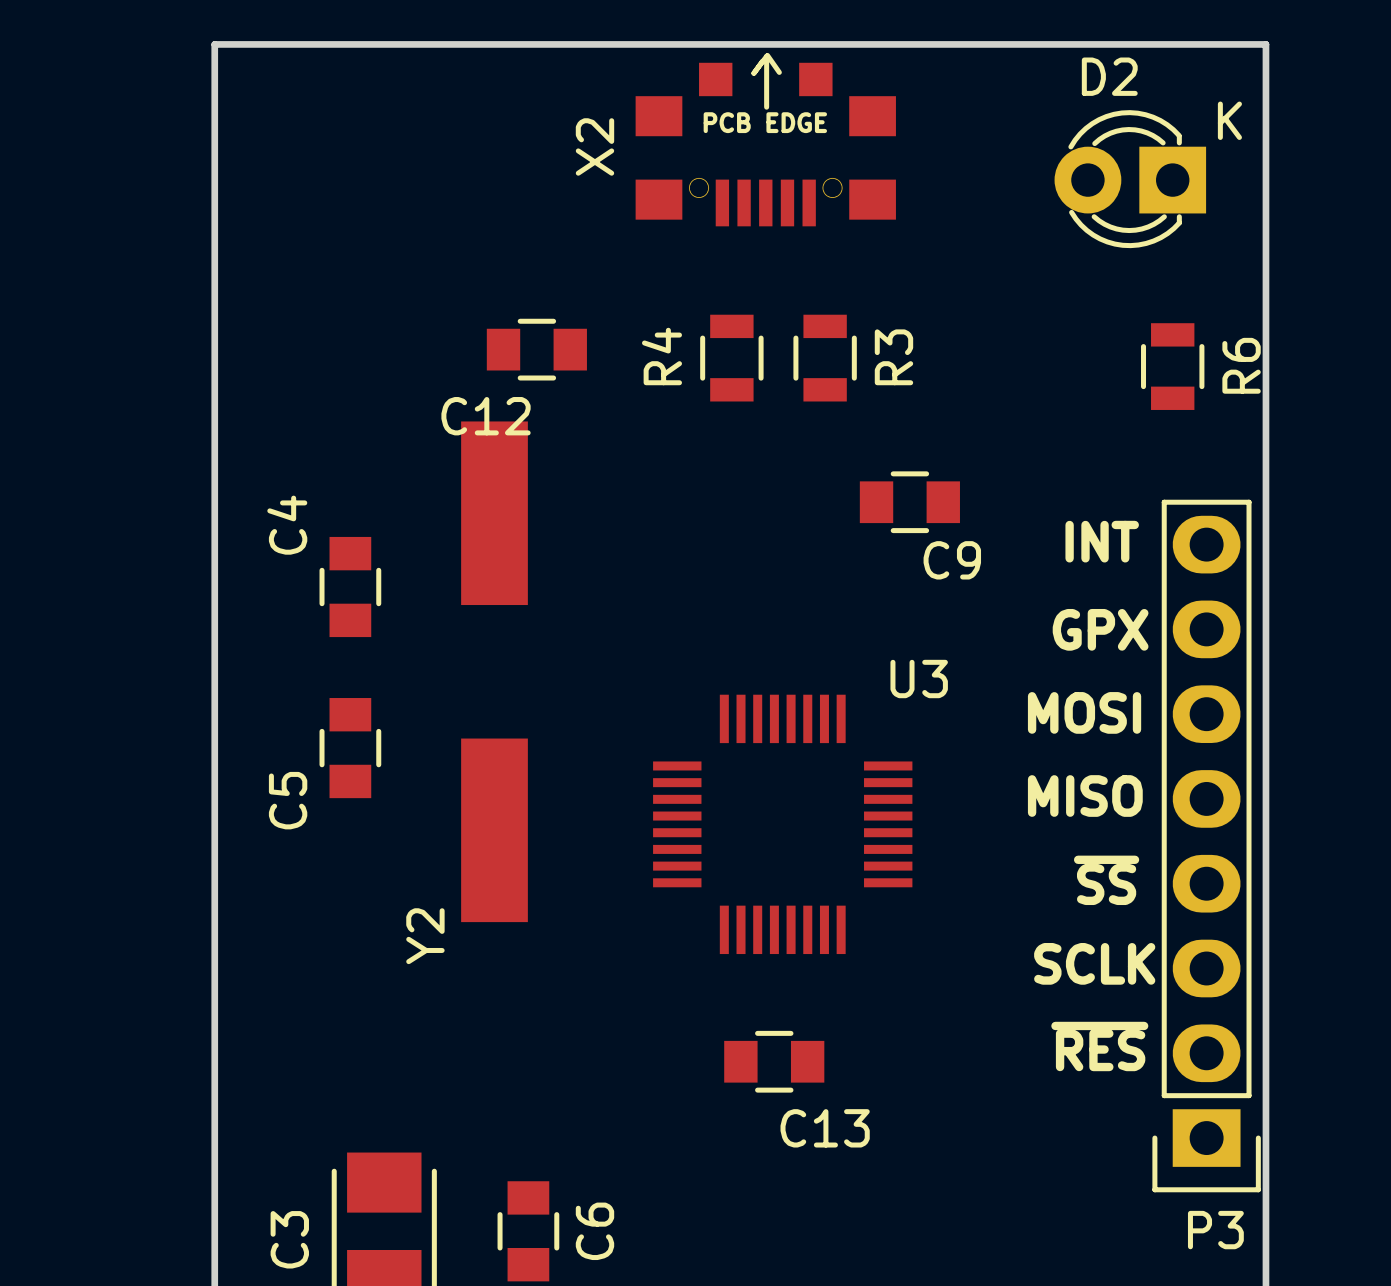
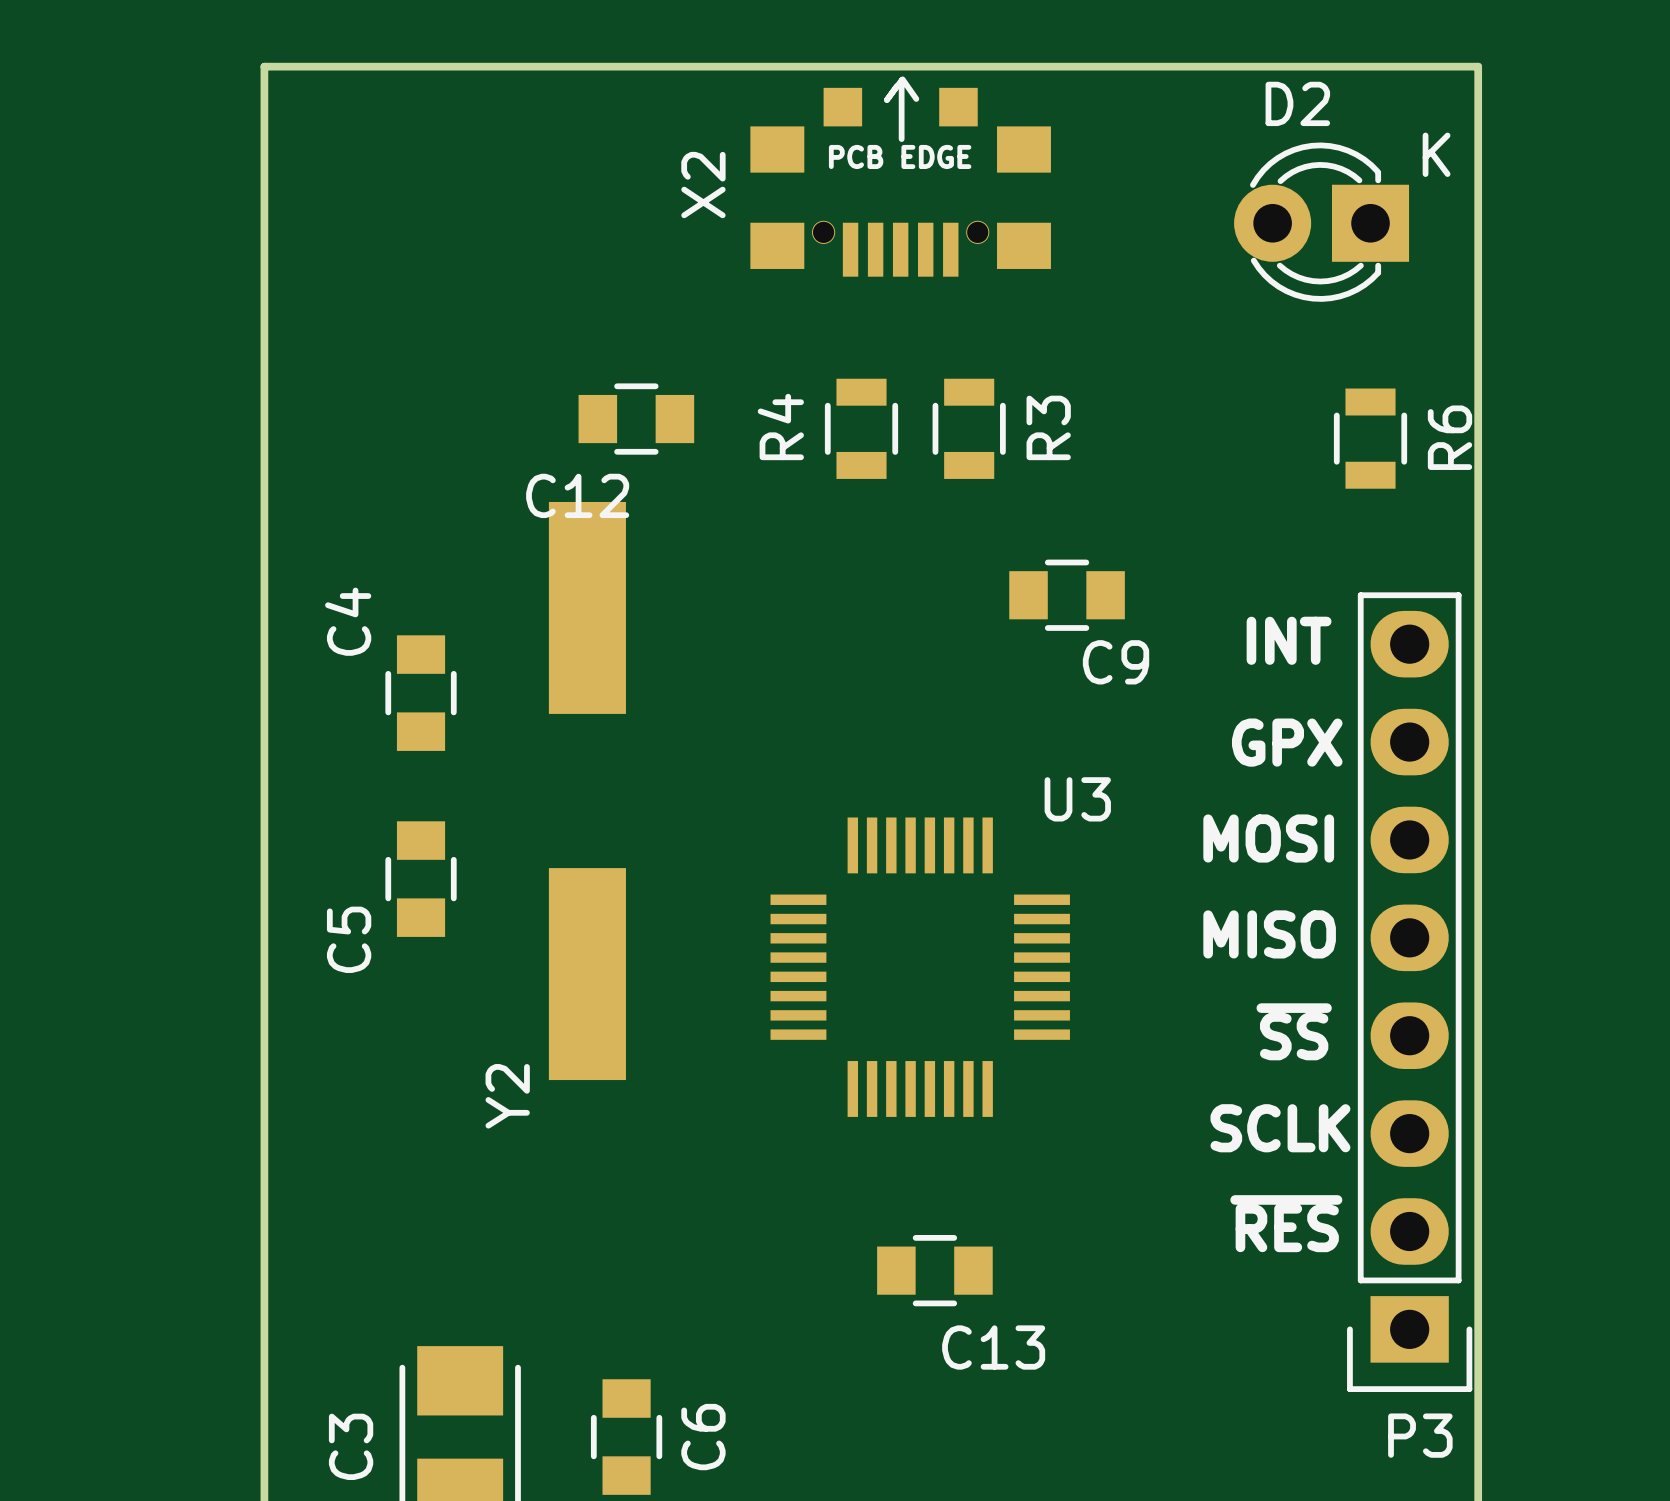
C13 position: (774, 1061) -> (934, 1270)

